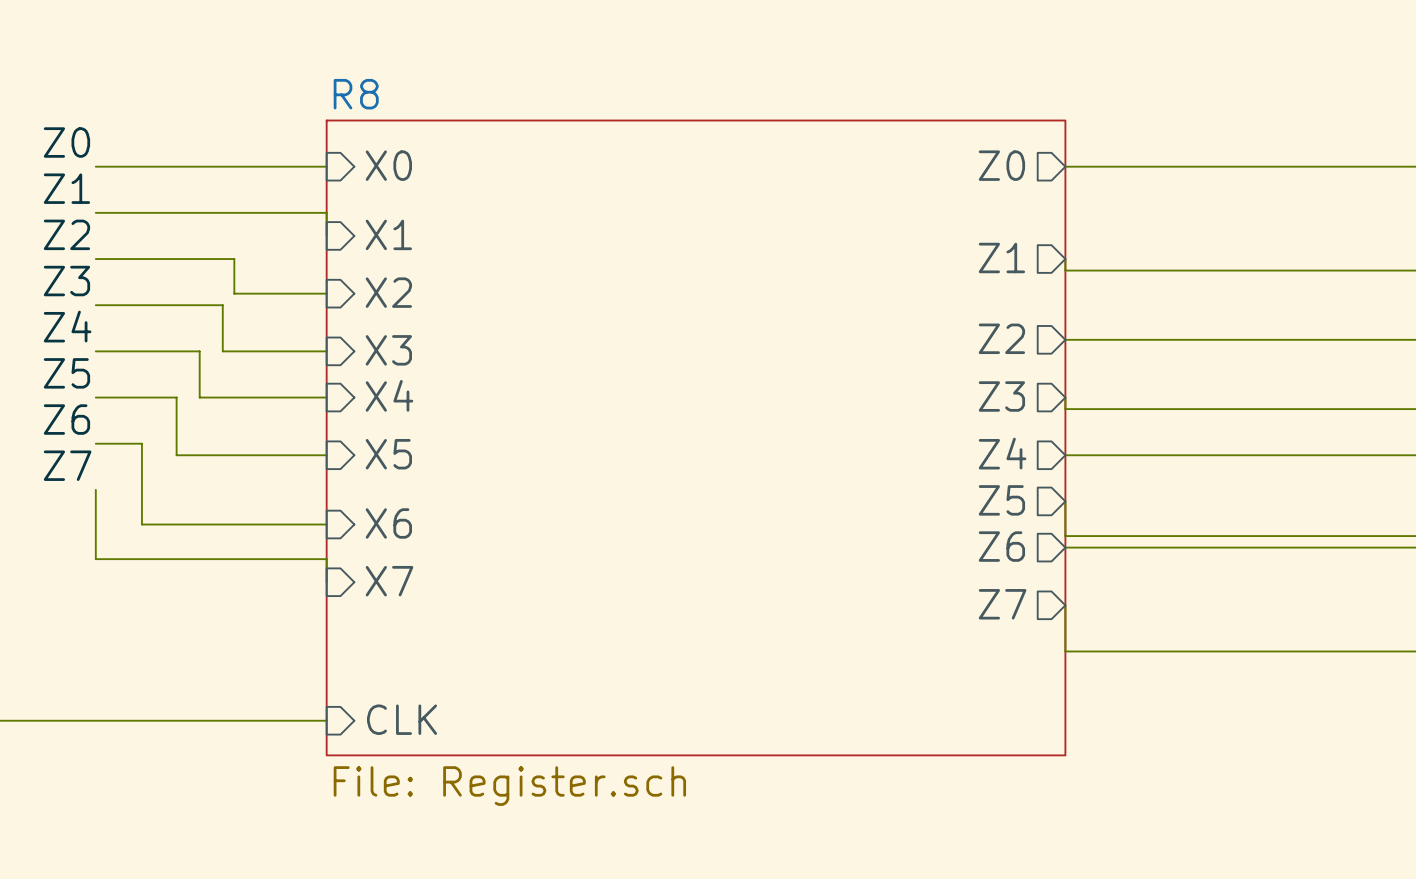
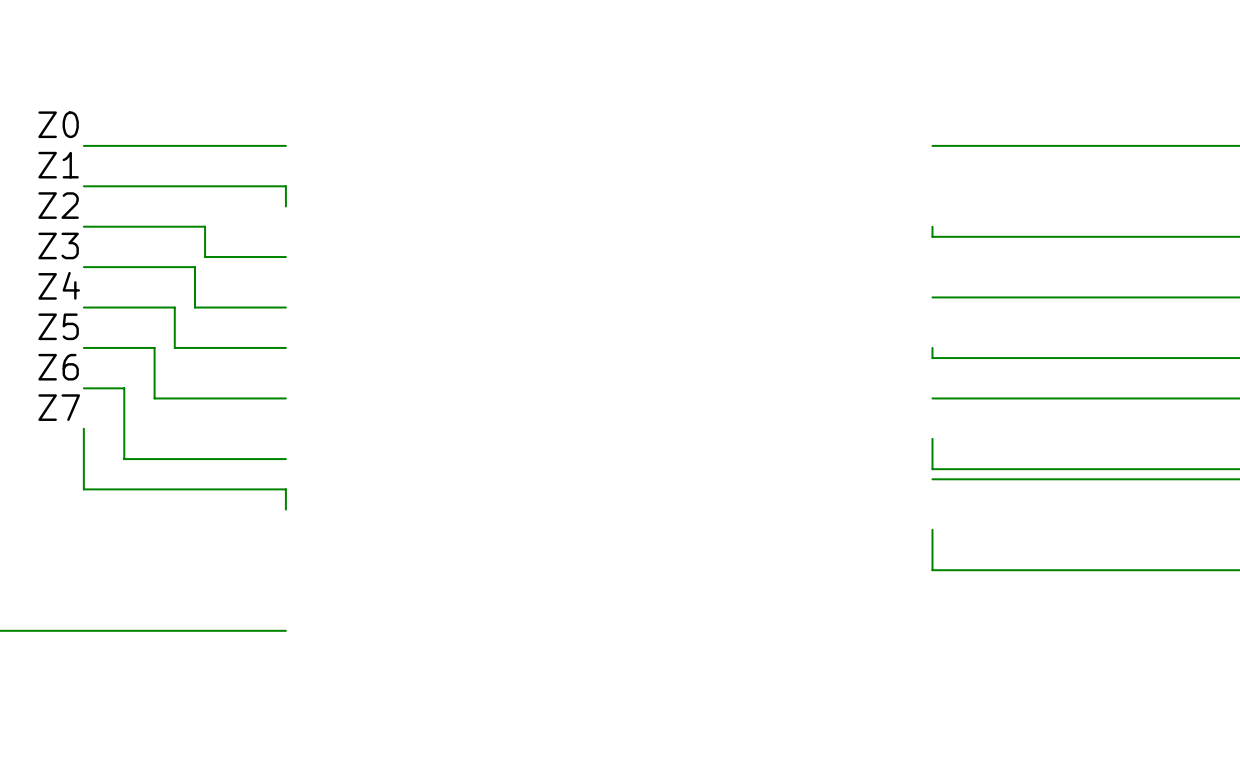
sheet pin: X0 (388, 165) -> none
sheet pin: Z0 (1001, 165) -> none
sheet pin: X1 (388, 234) -> none
sheet pin: Z1 (1001, 257) -> none
sheet pin: X2 (388, 292) -> none
sheet pin: Z2 (1001, 338) -> none
sheet pin: X3 (388, 350) -> none
sheet pin: X4 (389, 395) -> none
sheet pin: Z3 (1001, 396) -> none
sheet R8: File: Register.sch (696, 437) -> none
sheet pin: Z4 (1002, 453) -> none
sheet pin: X5 (388, 454) -> none
sheet pin: Z5 (1001, 500) -> none
sheet pin: X6 (388, 523) -> none
sheet pin: Z6 (1001, 546) -> none
sheet pin: X7 (389, 581) -> none
sheet pin: Z7 (1002, 604) -> none
sheet pin: CLK (402, 719) -> none

